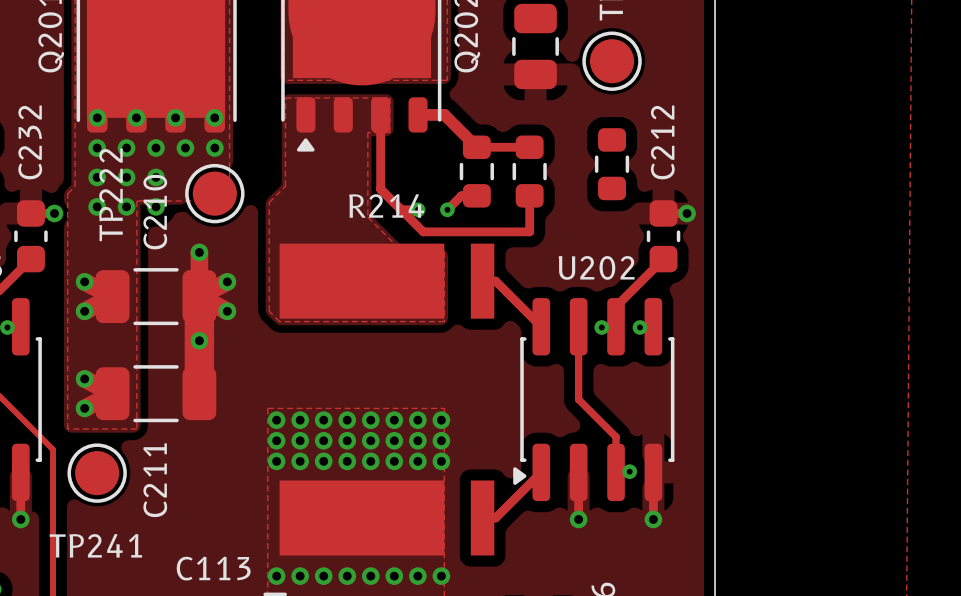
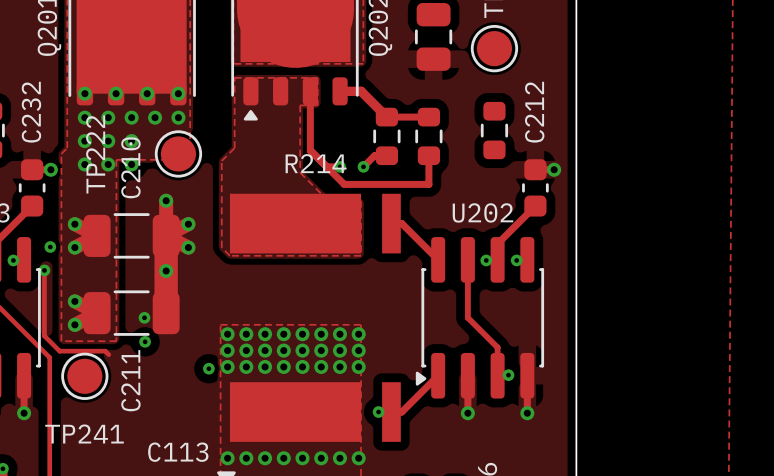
via: none -> (50, 247)
track: none -> (44, 270) (44, 335) (59, 351) (105, 351) (108, 354)
via: none -> (44, 270)
via: none -> (144, 317)
via: none -> (145, 341)
via: none -> (208, 368)
via: none -> (378, 412)

